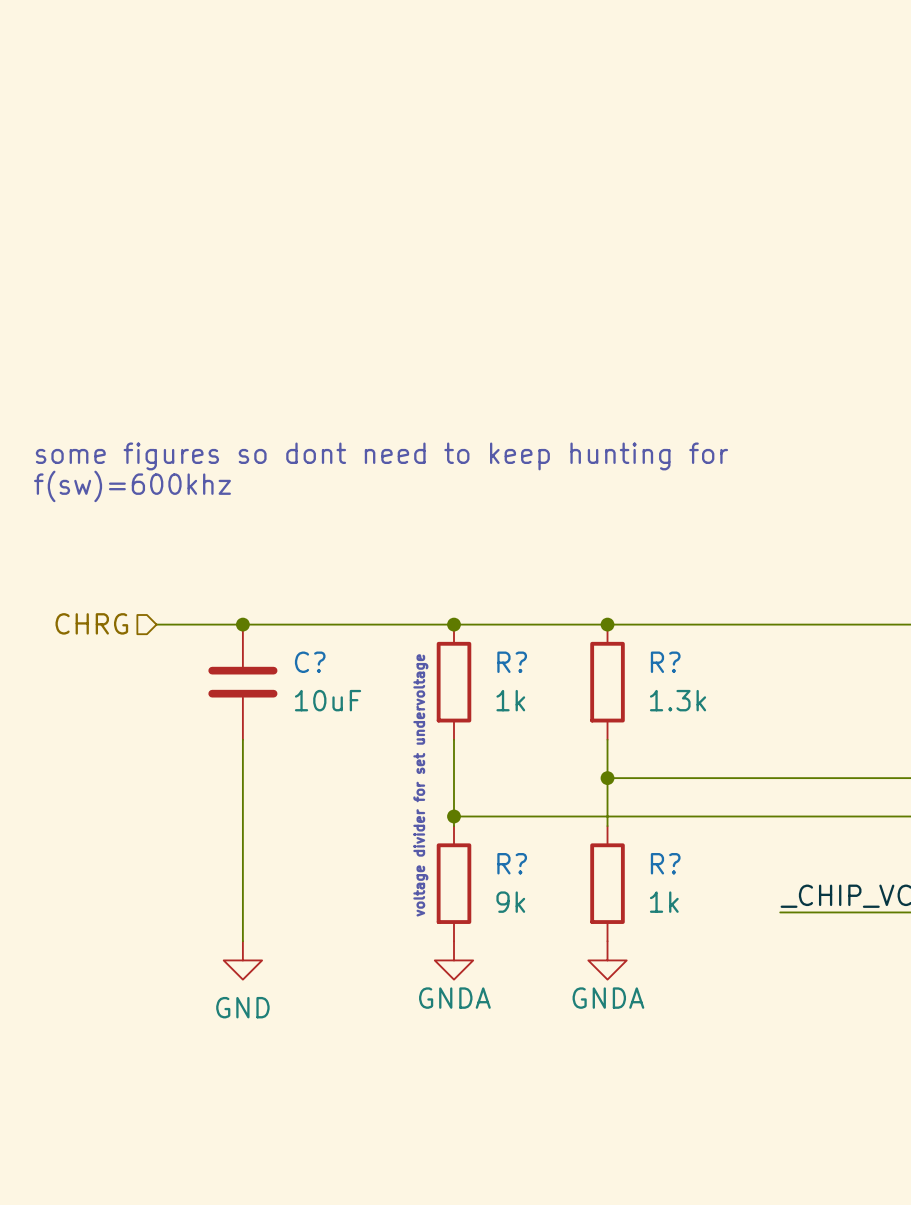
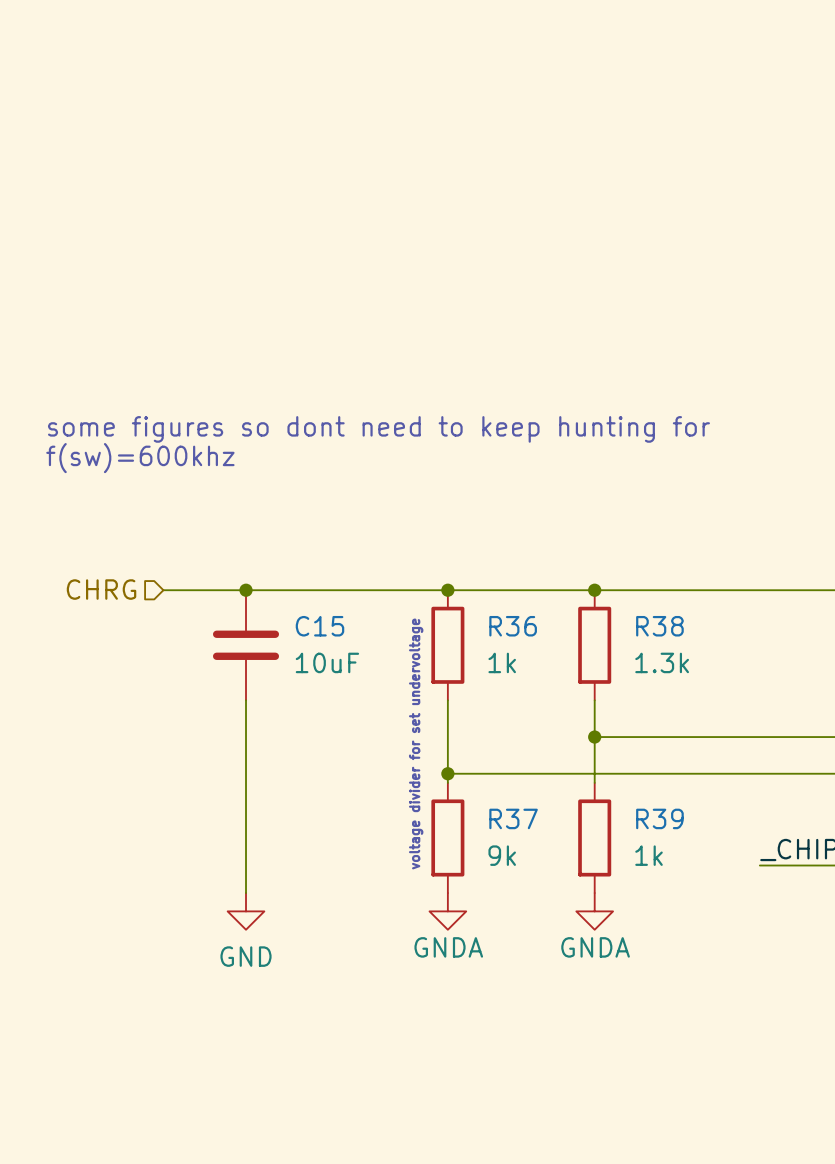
C? name: C? (310, 662) -> C15 (319, 626)
R? name: R? (512, 662) -> R36 (513, 626)
R? name: R? (665, 662) -> R38 (659, 626)
R? name: R? (512, 863) -> R37 (513, 818)
R? name: R? (665, 863) -> R39 (659, 818)

